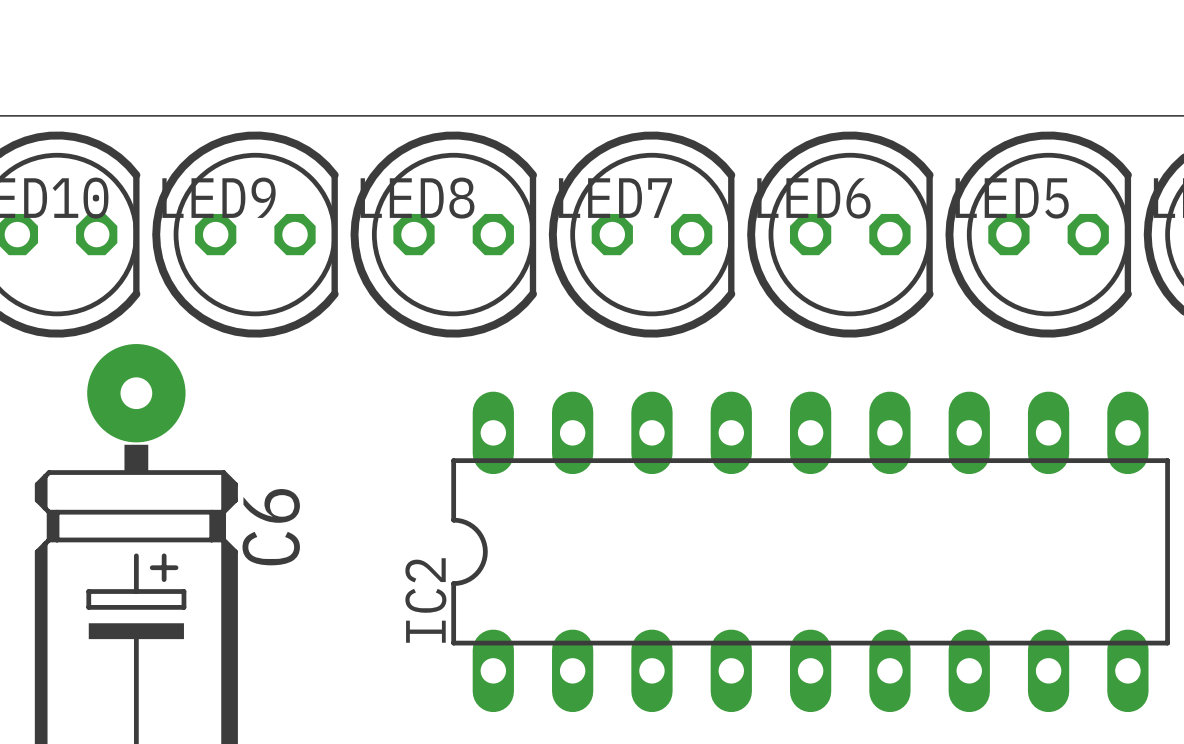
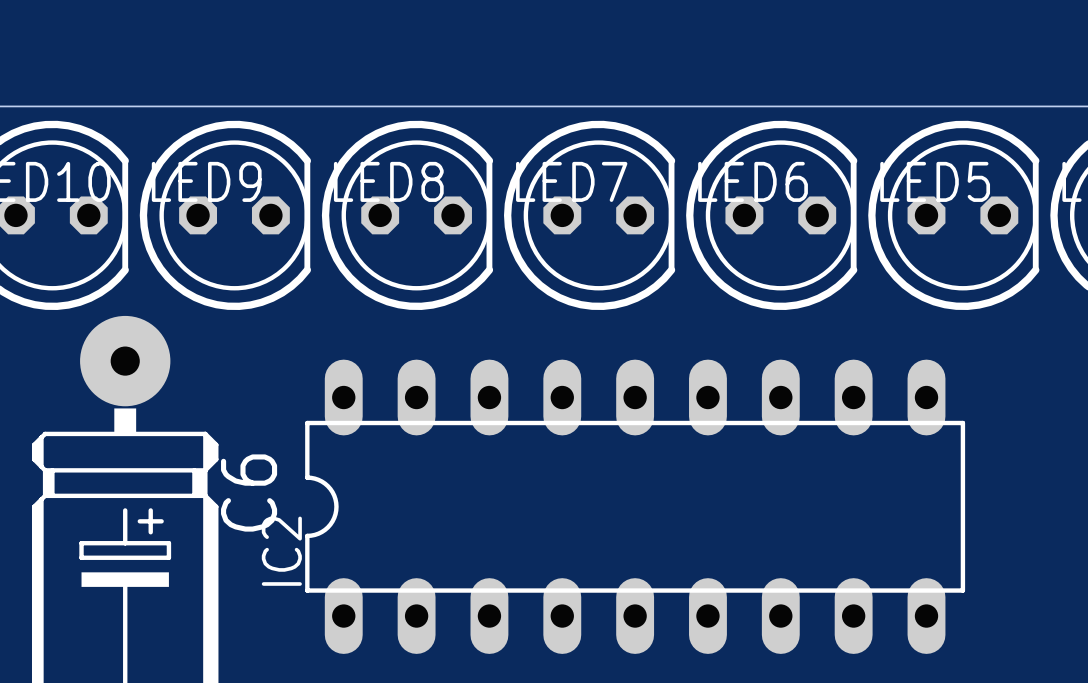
IC2 position: (810, 551) -> (635, 506)

